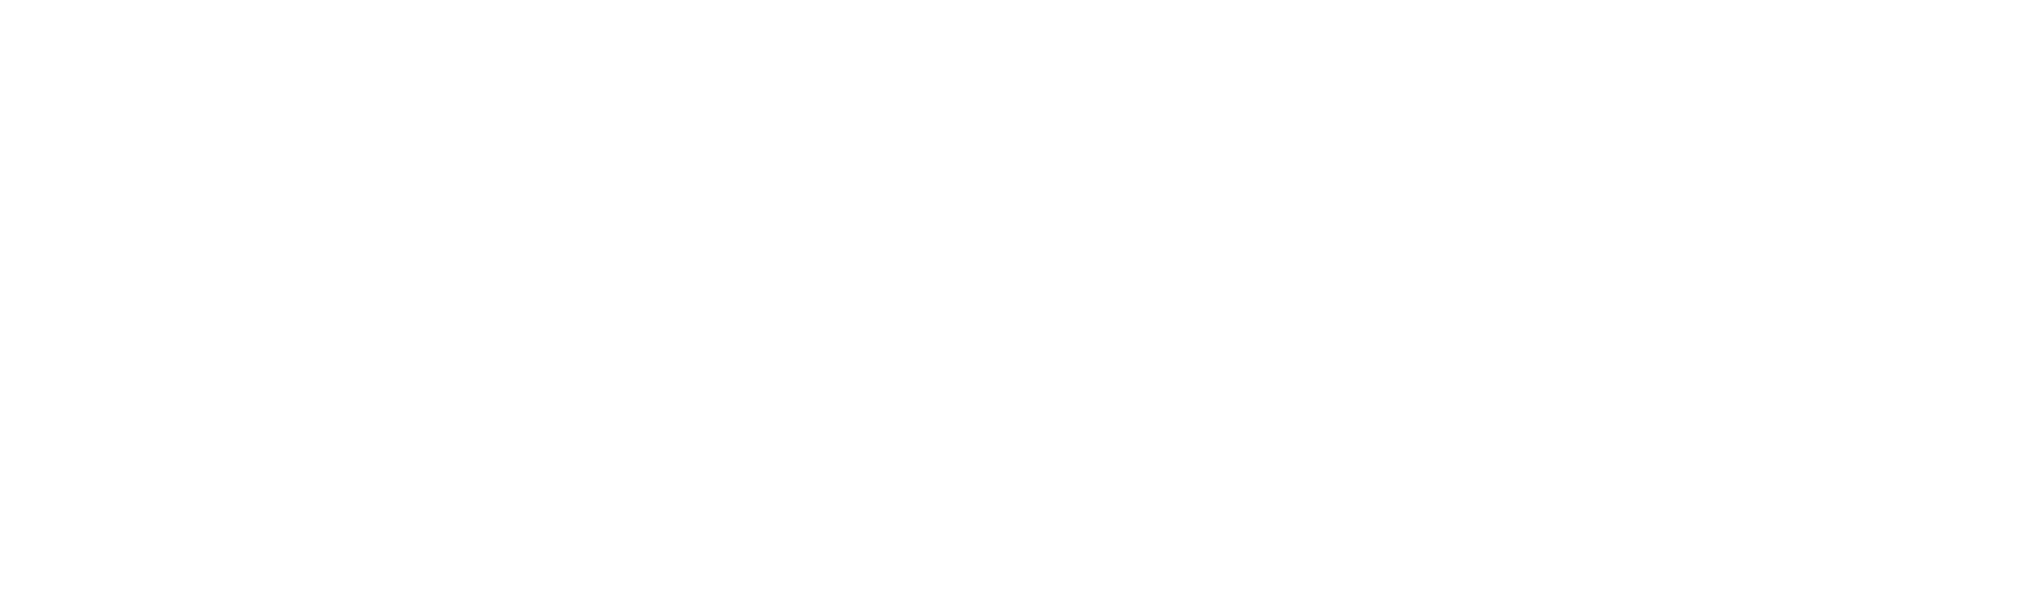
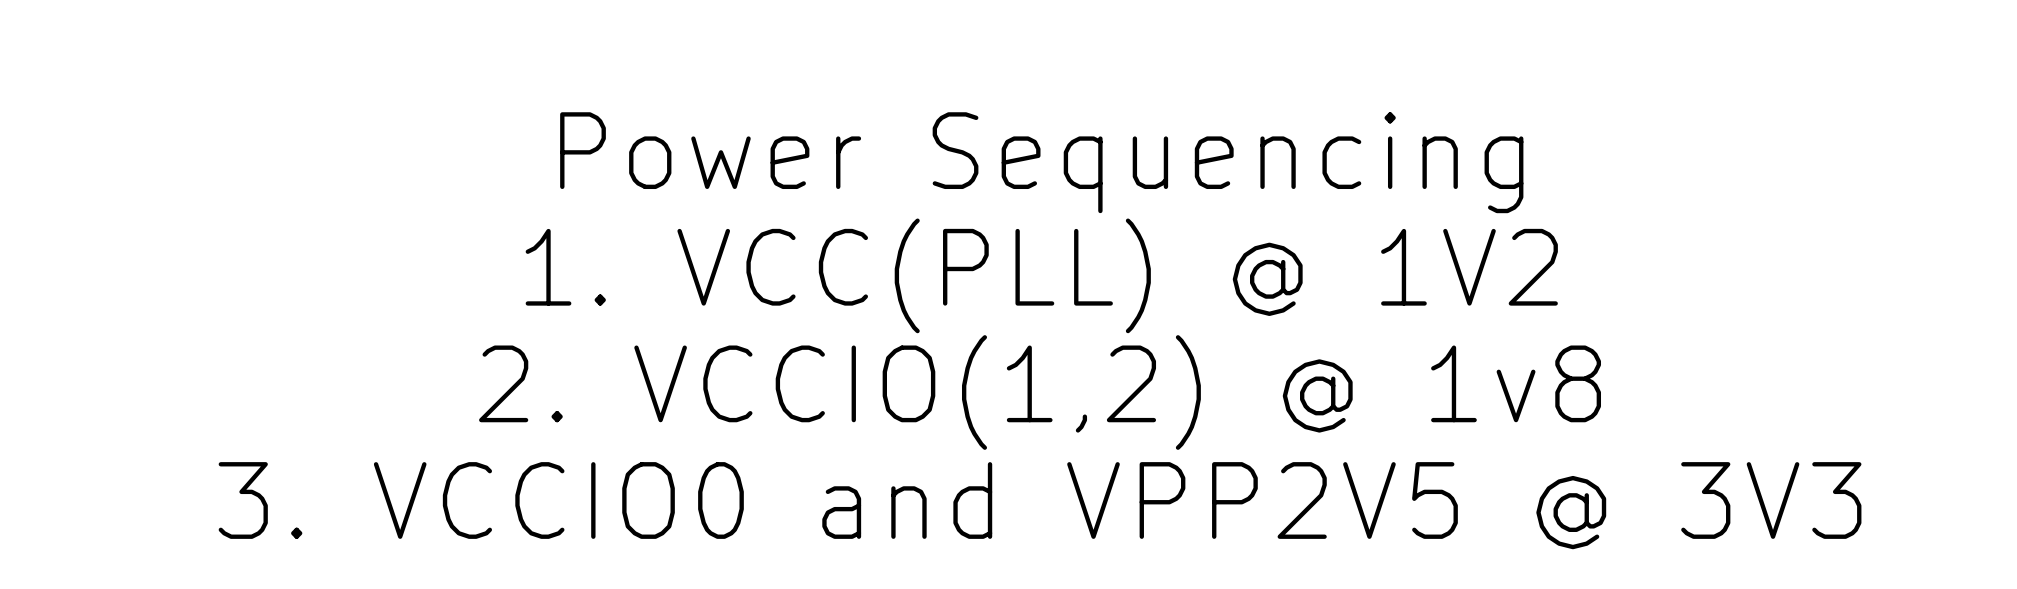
text: none -> Power Sequencing (1041, 162)
text: none -> 1. VCC(PLL) @ 1V2 (1041, 275)
text: none -> 2. VCCIO(1,2) @ 1v8 (1040, 392)
text: none -> 3. VCCIO0 and VPP2V5 @ 3V3 (1040, 505)

